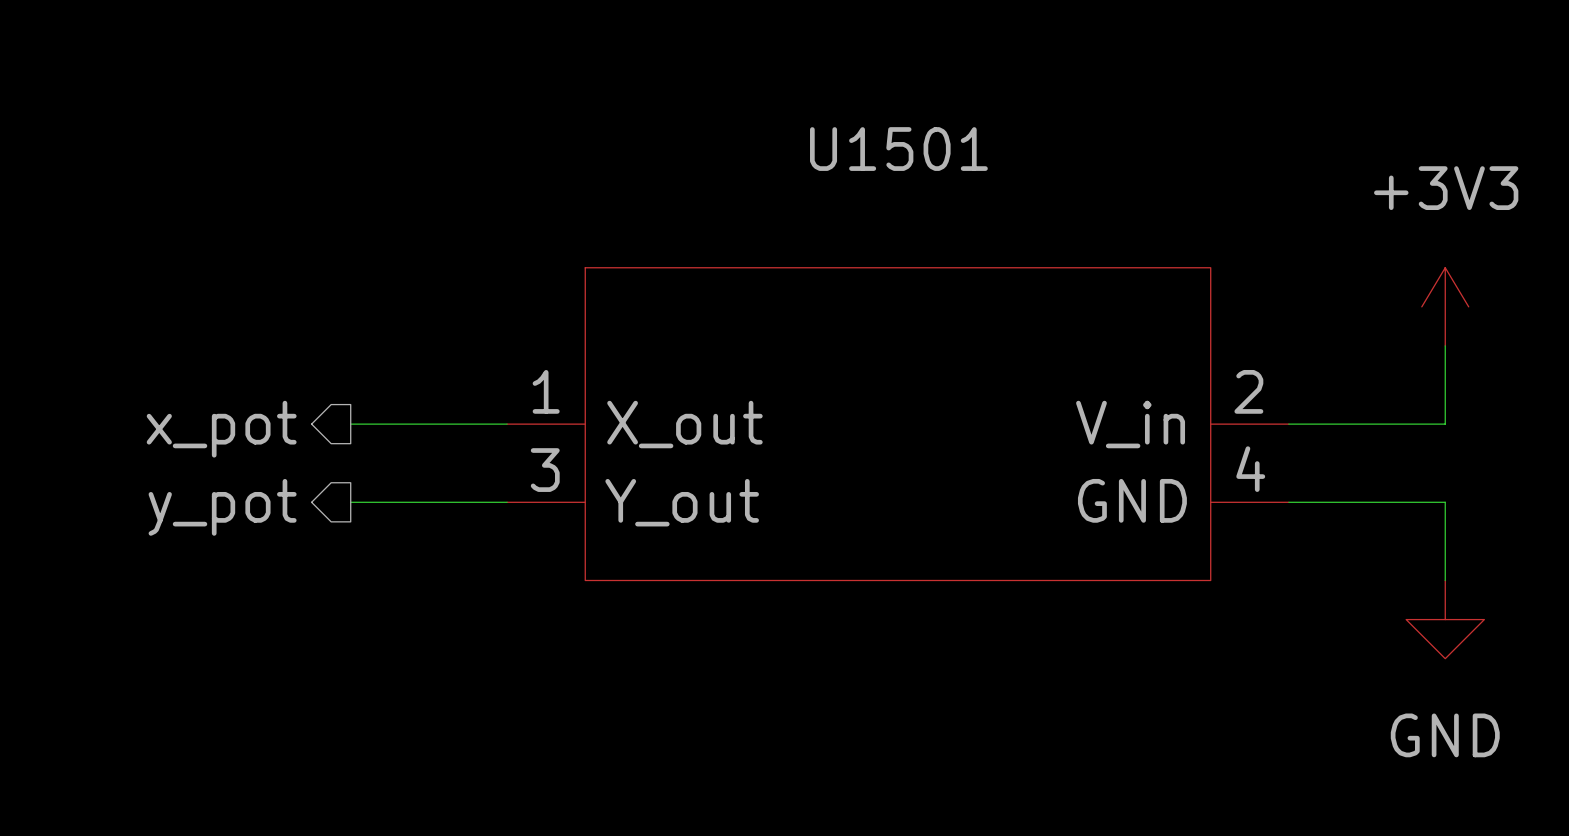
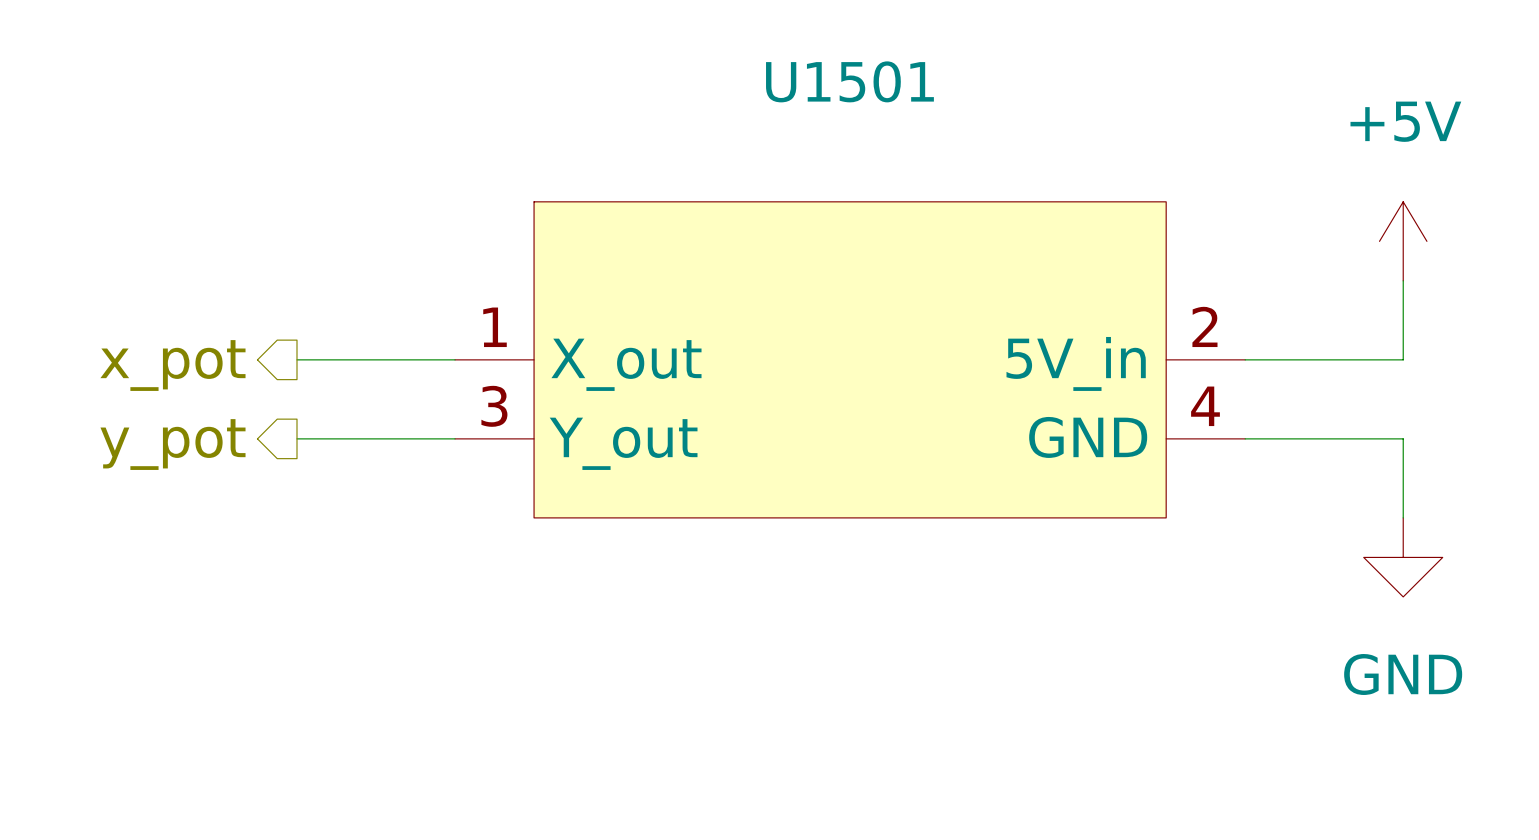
power symbol: +3V3 (1445, 306) -> +5V (1403, 241)
U1501 pin name: V_in (1130, 424) -> 5V_in (1076, 363)

